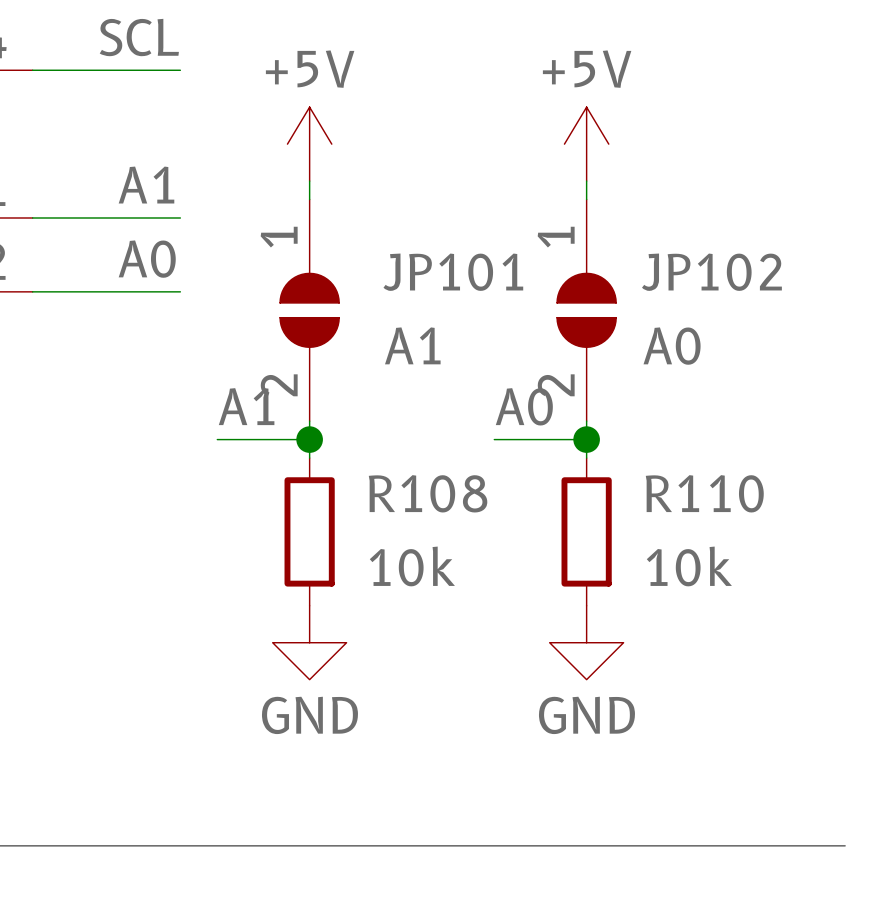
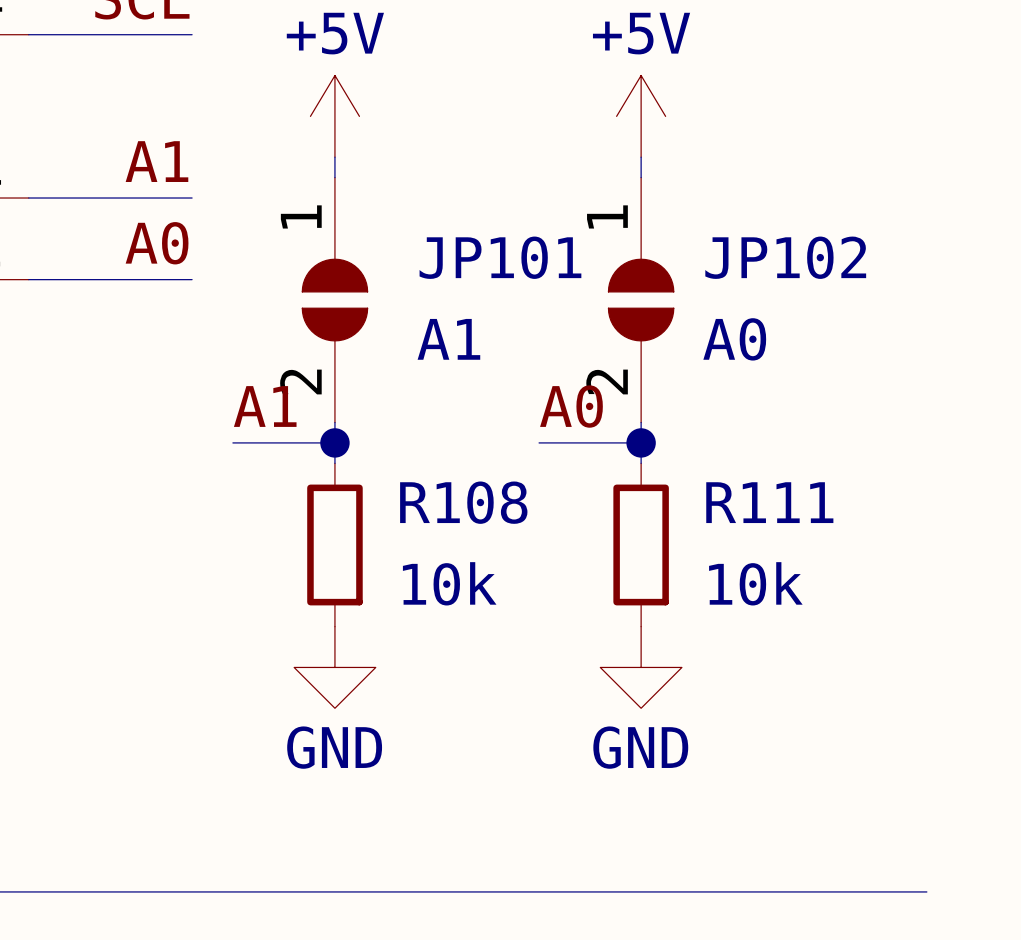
R110 name: R110 (704, 493) -> R111 (769, 502)

